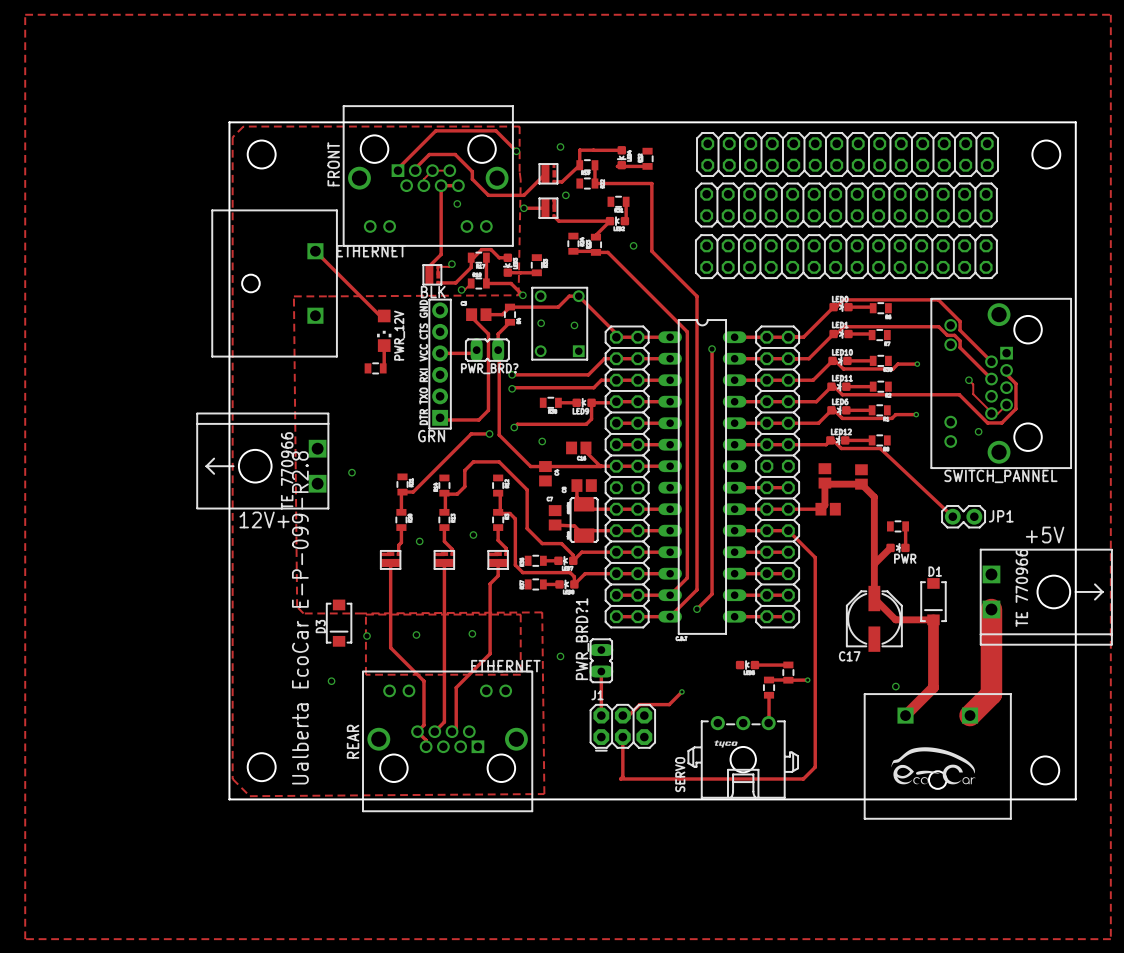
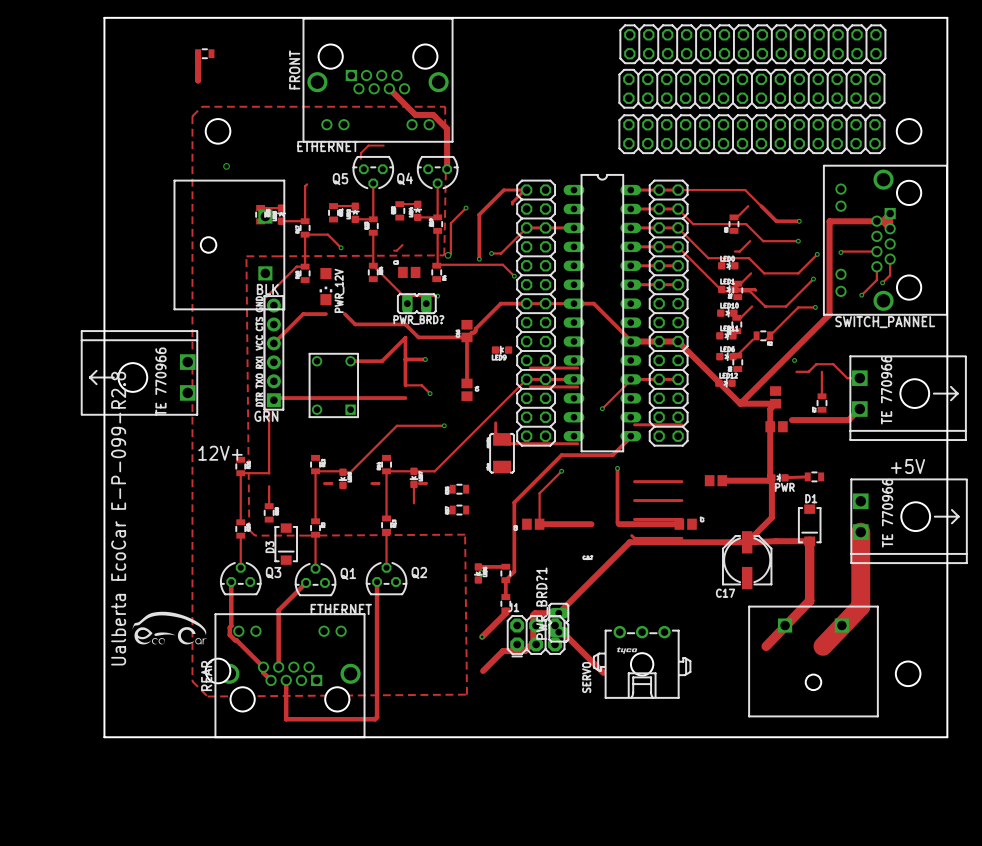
zone outline: (25, 14) (1110, 14) (1110, 939) (25, 939) (25, 14) -> none
part: none -> (752, 44)
track: none -> (198, 53) (198, 80)
part: none -> (204, 53)
track: none -> (389, 88) (415, 114) (433, 114) (447, 128) (447, 169)
part: none -> (751, 88)
board edge: (229, 122) (1075, 122) (1075, 799) (229, 799) (229, 122) -> (104, 17) (104, 737) (947, 737) (947, 17) (104, 17)
via: (560, 146) -> none
track: (579, 150) (593, 150) -> none
track: (579, 150) (579, 165) (562, 181) (553, 181) -> none
track: (593, 150) (621, 150) -> none
track: (516, 151) (496, 130) (435, 130) (397, 170) -> none
via: (516, 151) -> none
part position: (847, 154) -> (751, 134)
part rotation: 0° (621, 157) -> 180° (417, 210)
part position: (621, 157) -> (417, 210)
part position: (647, 158) -> (399, 210)
part rotation: 0° (587, 165) -> 90° clockwise (437, 224)
part position: (587, 165) -> (437, 224)
track: (594, 165) (594, 183) -> none
track: (621, 165) (617, 166) (647, 166) -> none
track: (415, 170) (429, 154) (455, 154) (472, 171) (472, 179) (488, 195) (523, 195) (545, 173) -> none
part: (548, 173) -> none
FRONT position: (428, 175) -> (378, 80)
part: (587, 183) -> none
track: (594, 183) (651, 183) (651, 251) (697, 296) (697, 589) (670, 616) (616, 616) -> none
track: (458, 185) (441, 185) (441, 254) (429, 266) (429, 274) -> none
via: none -> (226, 166)
via: (565, 195) -> none
track: (553, 200) (554, 208) -> none
Q5: none -> (373, 172)
Q4: none -> (437, 172)
part rotation: 0° (618, 201) -> 90° clockwise (333, 212)
part position: (618, 201) -> (333, 212)
track: (626, 201) (624, 221) -> none
via: (457, 203) -> none
part: (846, 205) -> none
track: (523, 208) (545, 208) -> none
via: (523, 208) -> none
part: (548, 208) -> none
track: none -> (373, 183) (373, 219) (355, 219)
track: none -> (437, 183) (437, 217)
track: none -> (307, 184) (305, 186) (305, 221) (281, 221)
track: (553, 216) (558, 221) (586, 221) -> (479, 259) (479, 214) (503, 190)
part rotation: 0° (617, 221) -> 90° clockwise (355, 212)
part position: (617, 221) -> (355, 212)
track: none -> (630, 190) (745, 190) (776, 221) (799, 221)
track: none -> (399, 204) (417, 204)
track: none -> (333, 206) (355, 206)
track: none -> (748, 206) (736, 217) (733, 217)
track: none -> (260, 207) (281, 208)
track: none -> (466, 208) (450, 223) (450, 254)
via: none -> (466, 208)
track: none -> (630, 208) (678, 208) (693, 224) (746, 224) (763, 241) (798, 241)
part position: (573, 243) -> (373, 272)
part position: (595, 244) -> (373, 226)
via: (633, 245) -> none
track: (315, 251) (380, 315) (384, 315) -> none
track: (573, 251) (607, 252) (687, 331) (687, 578) (670, 595) (616, 595) -> none
track: none -> (417, 217) (437, 217)
part: (846, 256) -> none
via: none -> (799, 221)
track: none -> (876, 221) (876, 221) (882, 221) (890, 228) (890, 213) (882, 221) (829, 221) (829, 314) (740, 403)
track: (471, 257) (473, 257) (481, 249) (491, 249) (499, 257) (507, 257) -> none
track: (471, 257) (471, 267) (455, 282) (437, 282) -> none
part rotation: 0° (478, 257) -> 90° clockwise (305, 227)
part position: (478, 257) -> (305, 227)
track: (486, 257) (486, 283) (511, 283) (522, 295) -> none
track: (451, 264) (449, 266) (437, 266) (438, 274) -> none
via: (451, 264) -> none
track: none -> (573, 227) (526, 227) (501, 253) (491, 253)
track: none -> (630, 227) (678, 227) (708, 258) (749, 258) (764, 273) (798, 273) (817, 254)
part rotation: 0° (507, 265) -> 180° (281, 214)
part position: (507, 265) -> (281, 214)
part position: (536, 265) -> (260, 214)
track: none -> (437, 230) (437, 264) (502, 264) (514, 276)
track: none -> (373, 232) (373, 265) (403, 296) (437, 296)
track: (507, 272) (536, 272) -> none
part: (432, 274) -> none
track: none -> (750, 241) (739, 251) (734, 251)
via: none -> (798, 241)
part rotation: 0° (478, 283) -> 90° clockwise (305, 273)
part position: (478, 283) -> (305, 273)
track: none -> (630, 246) (678, 246) (722, 291) (750, 291) (765, 306)
track: none -> (341, 247) (327, 234) (305, 234) (305, 266) (296, 266) (264, 298) (264, 408) (269, 412) (269, 473) (240, 473) (240, 522)
via: none -> (341, 247)
via: (461, 289) -> none
track: none -> (876, 251) (840, 252)
via: none -> (840, 252)
via: none -> (491, 253)
via: none -> (817, 254)
via: none -> (479, 259)
track: none -> (890, 259) (890, 275) (882, 282)
track: none -> (630, 265) (678, 265)
track: (848, 307) (873, 308) -> none
part rotation: 0° (880, 308) -> 90° clockwise (737, 362)
part position: (880, 308) -> (737, 362)
track: none -> (876, 266) (876, 280) (861, 295)
track: (471, 314) (471, 317) (488, 334) (488, 410) (478, 419) (442, 419) (440, 417) -> none
track: (486, 314) (502, 314) (509, 307) (558, 307) (569, 296) (578, 296) (616, 333) (616, 337) (670, 337) -> none
track: none -> (751, 273) (740, 283) (737, 283)
via: none -> (514, 276)
track: (509, 322) (498, 334) (499, 435) (530, 466) (601, 466) -> none
track: none -> (813, 279) (786, 306) (765, 306)
via: none -> (813, 279)
via: (541, 323) -> none
part position: (559, 323) -> (333, 385)
via: (574, 325) -> none
via: none -> (882, 282)
track: none -> (630, 284) (678, 284)
part rotation: 0° (879, 335) -> 90° clockwise (822, 403)
part position: (879, 335) -> (822, 403)
track: (734, 337) (803, 337) (833, 307) (836, 307) (843, 299) (938, 299) (960, 321) (960, 330) (991, 361) -> none
via: none -> (861, 295)
via: none -> (437, 296)
track: (384, 345) (383, 368) -> none
track: (712, 349) (712, 594) (697, 609) -> none
via: (712, 349) -> none
track: (476, 350) (473, 353) (440, 353) -> none
track: none -> (526, 303) (500, 303) (467, 337)
track: none -> (526, 303) (593, 303) (631, 341)
track: none -> (752, 306) (740, 317) (736, 317)
track: none -> (815, 307) (798, 307) (766, 339)
via: none -> (815, 307)
track: (670, 358) (604, 358) (588, 374) (512, 374) -> none
track: (734, 358) (808, 358) (833, 334) (836, 334) (843, 326) (938, 326) (947, 335) (954, 335) (960, 340) (960, 347) (991, 379) -> none
part: none -> (536, 313)
part: none -> (668, 313)
track: (847, 360) (873, 360) -> none
part rotation: 0° (880, 360) -> 90° clockwise (736, 324)
part position: (880, 360) -> (736, 324)
track: none -> (325, 314) (303, 314) (273, 343)
track: none -> (344, 314) (355, 324) (405, 324) (418, 337) (467, 337)
part position: (440, 364) -> (273, 352)
track: (917, 364) (897, 364) (893, 368) (843, 368) (835, 360) (832, 360) (813, 380) (734, 380) -> none
via: (917, 364) -> none
part: (375, 368) -> none
track: (1006, 370) (1006, 374) (1015, 383) (1015, 408) (1001, 422) (987, 422) (959, 394) (842, 394) (834, 386) (831, 386) (816, 401) (734, 401) -> none
via: (512, 374) -> none
track: (670, 380) (601, 380) (593, 387) (512, 388) -> none
track: (968, 380) (973, 384) (973, 394) (991, 413) (997, 413) (1006, 404) -> none
via: (968, 380) -> none
SWITCH_PANNEL position: (1001, 383) -> (885, 240)
track: (846, 386) (873, 386) -> none
via: (512, 388) -> none
track: none -> (467, 337) (467, 383)
track: none -> (752, 339) (737, 355)
track: none -> (630, 341) (678, 341) (740, 403)
track: (670, 401) (591, 402) (591, 419) (586, 424) (517, 424) (514, 427) -> none
part rotation: 0° (550, 402) -> 90° clockwise (269, 512)
part position: (550, 402) -> (269, 512)
track: (558, 402) (576, 402) -> none
track: (846, 410) (872, 410) -> none
part rotation: 0° (879, 410) -> 90° clockwise (737, 290)
part position: (879, 410) -> (737, 290)
track: none -> (405, 359) (425, 359)
via: none -> (425, 359)
track: (916, 414) (895, 414) (891, 418) (842, 418) (834, 410) (831, 410) (818, 423) (734, 423) -> none
track: none -> (350, 361) (382, 361) (405, 337) (405, 385) (421, 385) (430, 393)
via: (514, 427) -> none
track: none -> (796, 371) (808, 371)
track: none -> (808, 371) (816, 364) (833, 364) (847, 378) (859, 378)
track: none -> (821, 371) (821, 396)
via: (978, 431) -> none
track: (489, 433) (471, 433) (413, 492) (402, 492) -> none
via: (489, 433) -> none
track: none -> (573, 379) (526, 379) (434, 471) (413, 471)
track: none -> (678, 379) (630, 379) (602, 408)
track: (845, 440) (872, 440) -> none
part rotation: 0° (879, 440) -> 90° clockwise (733, 224)
part position: (879, 440) -> (733, 224)
via: (542, 441) -> none
track: (734, 444) (826, 444) (833, 440) (841, 448) (880, 448) (952, 516) -> none
part rotation: 0° (578, 447) -> 90° clockwise (467, 331)
part position: (578, 447) -> (467, 331)
track: (585, 447) (585, 451) (600, 466) (670, 466) -> none
via: none -> (430, 393)
part: none -> (775, 397)
track: none -> (405, 398) (276, 398) (273, 400)
part: none -> (908, 398)
part position: (262, 461) -> (139, 372)
track: none -> (740, 403) (775, 403) (770, 409) (771, 517) (747, 542)
via: none -> (602, 408)
track: none -> (859, 409) (848, 420) (792, 420)
via: (351, 472) -> none
part position: (545, 473) -> (467, 389)
part: (824, 475) -> none
part: (627, 476) -> none
part position: (702, 476) -> (602, 313)
part: (777, 476) -> none
part: (861, 476) -> none
part position: (402, 484) -> (240, 466)
part position: (444, 485) -> (386, 464)
part position: (498, 485) -> (315, 464)
part position: (584, 485) -> (533, 524)
track: none -> (444, 425) (396, 425) (350, 472) (315, 471) (315, 521)
via: none -> (444, 425)
part: none -> (776, 426)
track: (402, 492) (401, 512) -> none
track: (498, 493) (500, 495) (500, 511) (498, 512) (509, 513) (515, 518) (515, 565) (522, 572) (570, 572) (574, 576) (574, 584) (585, 573) (670, 573) -> none
track: (445, 494) (457, 494) (464, 486) (464, 470) (473, 461) (499, 461) (527, 489) (527, 528) (542, 543) (561, 543) (573, 555) (573, 560) (581, 552) (670, 552) -> none
track: (445, 494) (444, 512) -> none
track: none -> (631, 436) (612, 455) (561, 455) (514, 502) (514, 571) (505, 580) (505, 597)
track: (734, 509) (820, 509) (824, 505) (824, 483) (861, 484) (874, 497) (874, 598) (895, 619) -> (747, 542) (776, 541)
part: (828, 509) -> none
JP1: (963, 516) -> none
part rotation: 0° (555, 517) -> 90° clockwise (685, 524)
part position: (555, 517) -> (685, 524)
part position: (401, 519) -> (240, 528)
part position: (444, 519) -> (386, 525)
part position: (498, 519) -> (315, 528)
track: (555, 525) (574, 526) (584, 535) (589, 530) (670, 530) -> none
part position: (898, 526) -> (814, 476)
track: (905, 526) (905, 547) -> (807, 476) (785, 477)
track: (401, 527) (401, 542) (398, 545) (398, 554) -> none
track: (444, 527) (444, 541) (452, 549) (452, 554) -> none
track: (498, 527) (498, 540) (506, 548) (506, 554) -> none
track: (734, 530) (788, 530) (815, 557) (815, 767) (803, 779) (620, 779) (622, 776) (622, 737) -> none
via: (473, 535) -> none
track: none -> (617, 468) (619, 524) (679, 524)
via: none -> (617, 468)
track: none -> (413, 471) (386, 471) (386, 518)
track: none -> (561, 471) (539, 493) (539, 524) (591, 524)
via: none -> (561, 471)
via: (419, 541) -> none
part: none -> (715, 480)
track: (887, 551) (874, 564) -> (769, 480) (722, 480)
track: none -> (413, 484) (413, 503)
track: none -> (269, 486) (269, 506)
part: (390, 559) -> none
part: (444, 559) -> none
part: (498, 559) -> none
track: (543, 560) (558, 560) -> none
part rotation: 0° (565, 560) -> 90° counterclockwise (413, 477)
part position: (565, 560) -> (413, 477)
track: (390, 562) (390, 647) (423, 681) (423, 725) (417, 731) (426, 740) (426, 746) -> none
track: (444, 562) (444, 722) (434, 731) -> none
track: (498, 562) (498, 575) (490, 583) (490, 653) (456, 687) (456, 727) (452, 731) -> none
track: (543, 584) (559, 584) -> none
part rotation: 0° (566, 584) -> 90° counterclockwise (342, 478)
part position: (566, 584) -> (342, 478)
track: none -> (386, 531) (386, 567)
via: (697, 609) -> none
track: none -> (315, 534) (315, 568)
track: none -> (240, 535) (240, 567)
zone outline: (365, 614) (520, 614) (520, 674) (365, 674) (365, 614) -> none
text position: Ualberta EcoCar E-P-099-R2.8 (300, 617) -> Ualberta EcoCar E-P-099-R2.8 (118, 518)
C17 position: (874, 618) -> (747, 560)
track: none -> (747, 542) (629, 542) (558, 613) (535, 613) (533, 615) (533, 642) (524, 651) (502, 651) (483, 670)
via: (472, 633) -> none
via: (416, 634) -> none
via: (367, 636) -> none
track: none -> (505, 566) (478, 566)
part: none -> (505, 573)
PWR_BRD?1 position: (601, 660) -> (558, 622)
Q3: none -> (240, 578)
Q2: none -> (386, 578)
Q1: none -> (315, 579)
part rotation: 0° (747, 665) -> 90° counterclockwise (478, 573)
part position: (747, 665) -> (478, 573)
track: (754, 665) (788, 665) -> none
track: none -> (231, 581) (229, 634) (263, 667) (263, 672) (271, 680)
track: none -> (377, 581) (377, 717) (375, 719) (286, 719) (286, 680)
track: none -> (306, 582) (278, 610) (278, 667)
track: (601, 671) (601, 715) -> none
part: (788, 672) -> none
track: (769, 680) (807, 680) -> none
via: (807, 680) -> none
via: (331, 681) -> none
via: (895, 686) -> none
part: (769, 687) -> none
track: (933, 687) (905, 715) -> (809, 600) (766, 646)
part: none -> (505, 603)
track: (681, 691) (669, 704) (639, 704) (628, 715) (622, 715) -> none
via: (681, 691) -> none
track: (991, 694) (970, 715) -> (860, 606) (822, 646)
track: (769, 695) (768, 723) -> none
track: none -> (505, 610) (505, 613) (482, 636)
drawing: none -> [132, 611, 207, 645]
track: none -> (558, 632) (562, 632) (603, 672)
via: none -> (482, 636)
REAR position: (447, 741) -> (289, 675)
drawing: [891, 747, 976, 785] -> none

